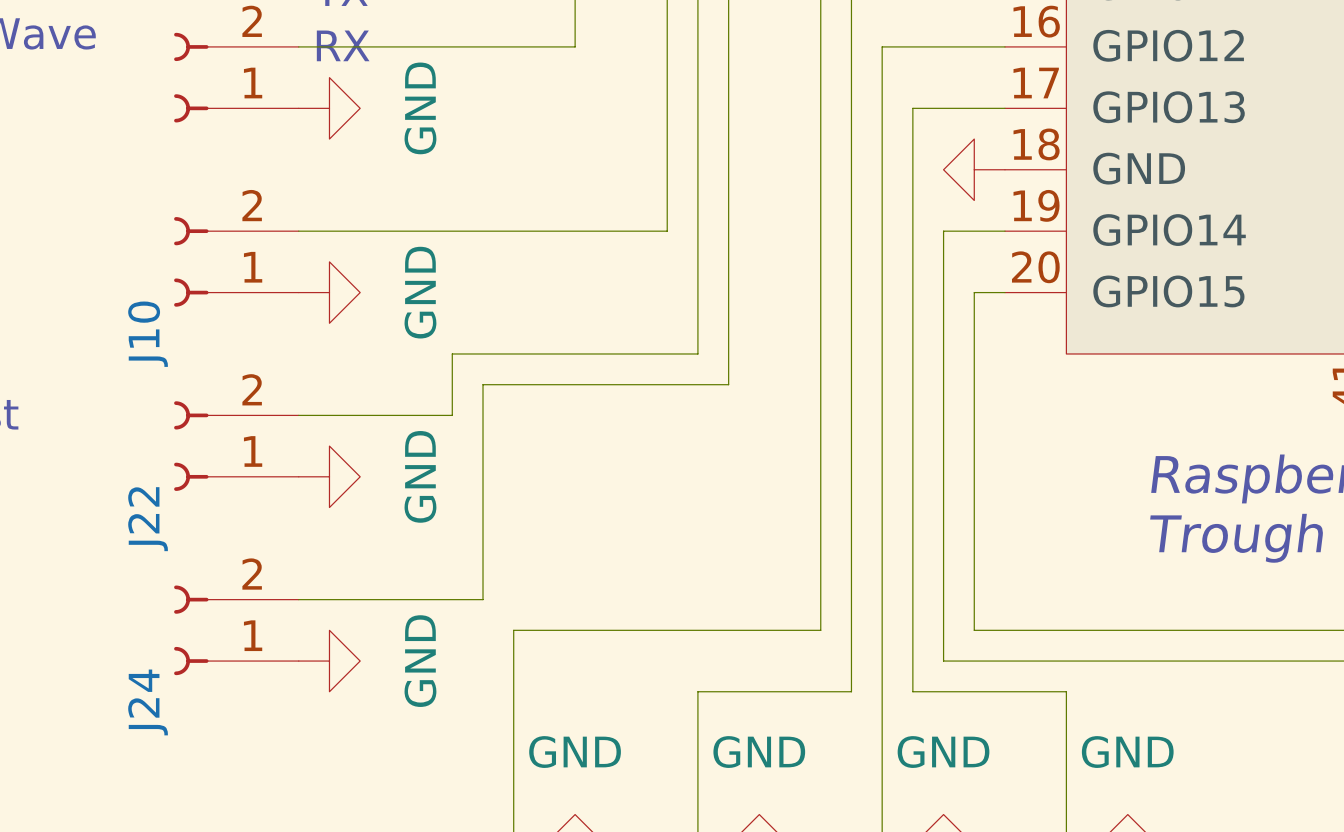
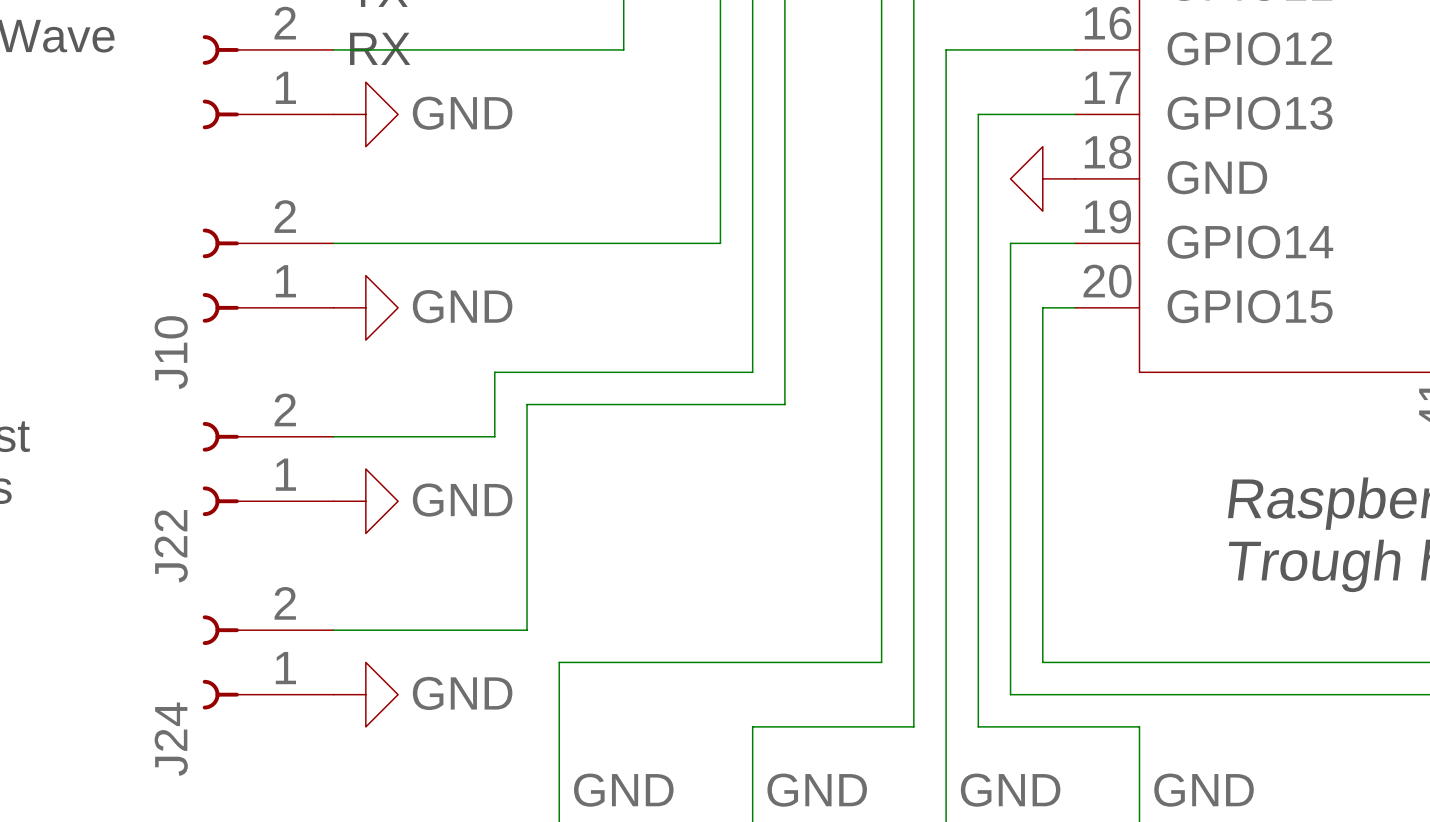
power symbol text rotation: 0° (420, 108) -> 90° clockwise (462, 113)
power symbol text rotation: 0° (420, 292) -> 90° clockwise (462, 306)
power symbol text rotation: 0° (420, 476) -> 90° clockwise (462, 500)
power symbol text rotation: 0° (420, 661) -> 90° clockwise (462, 693)

